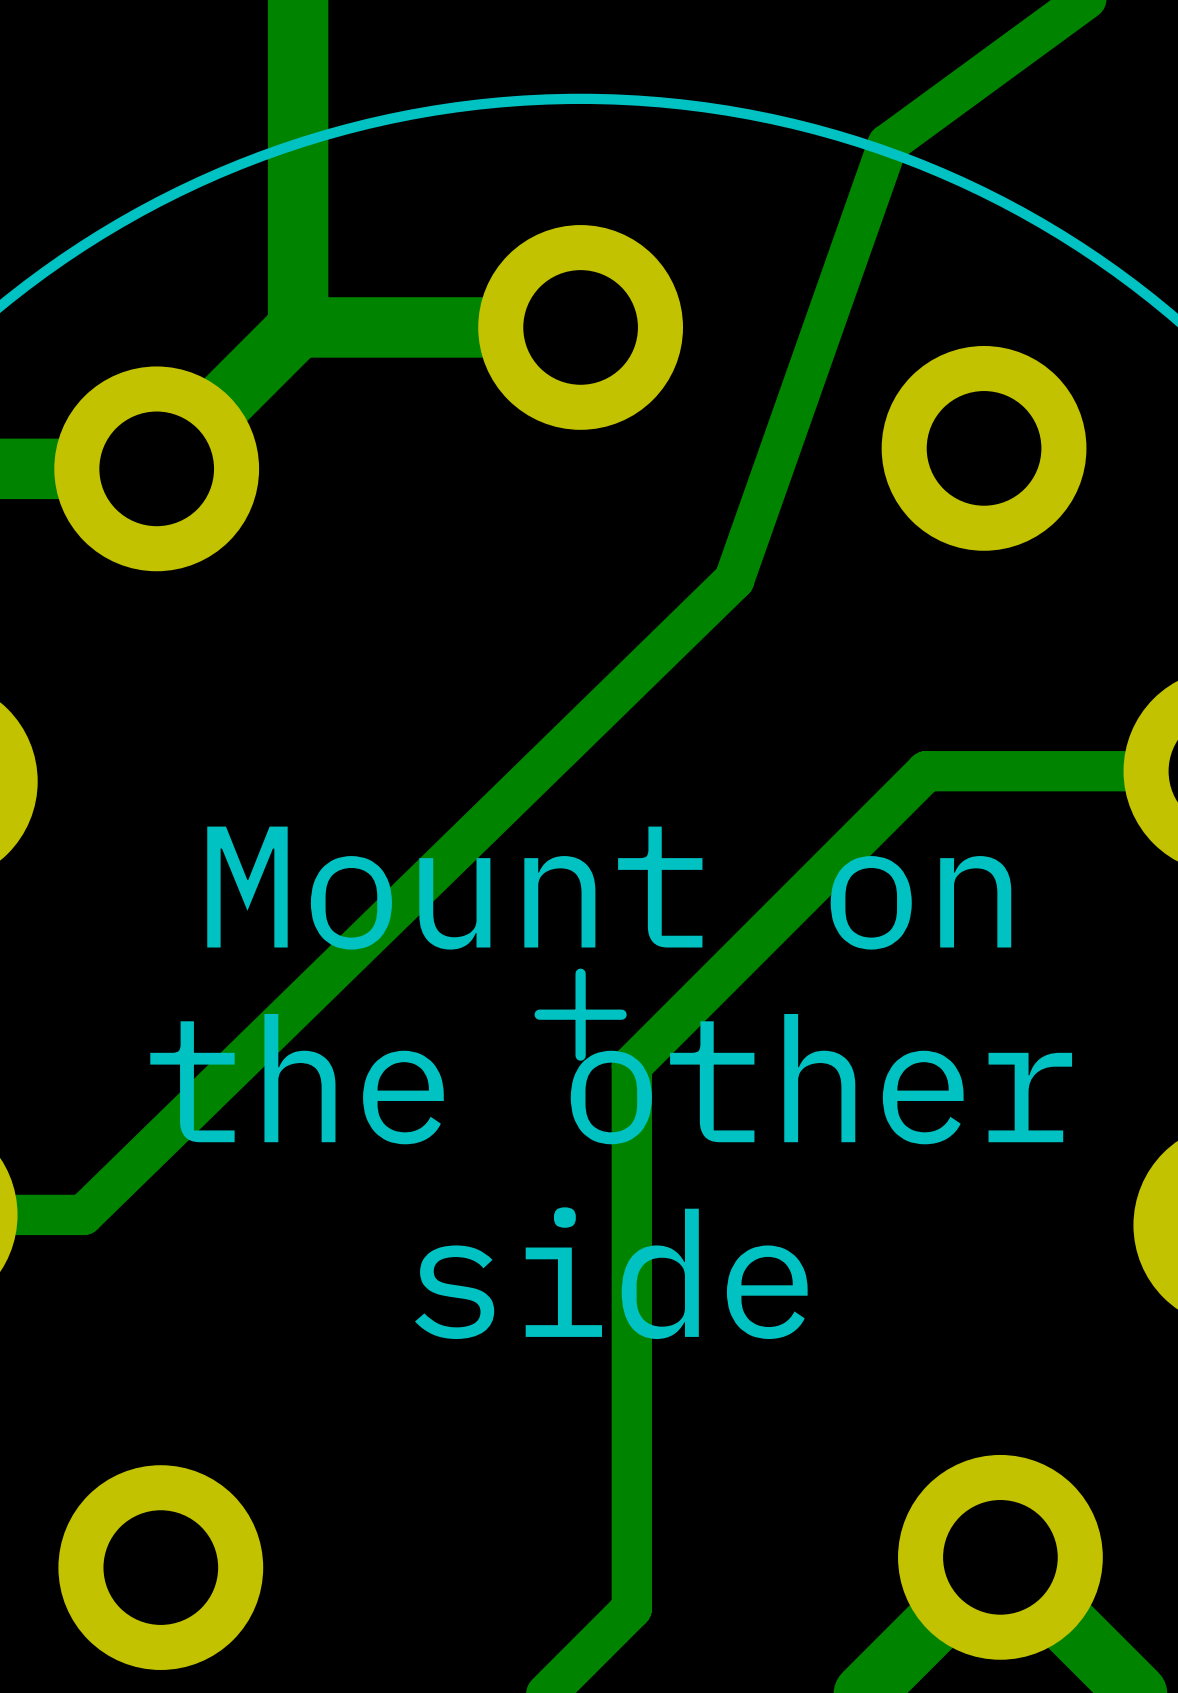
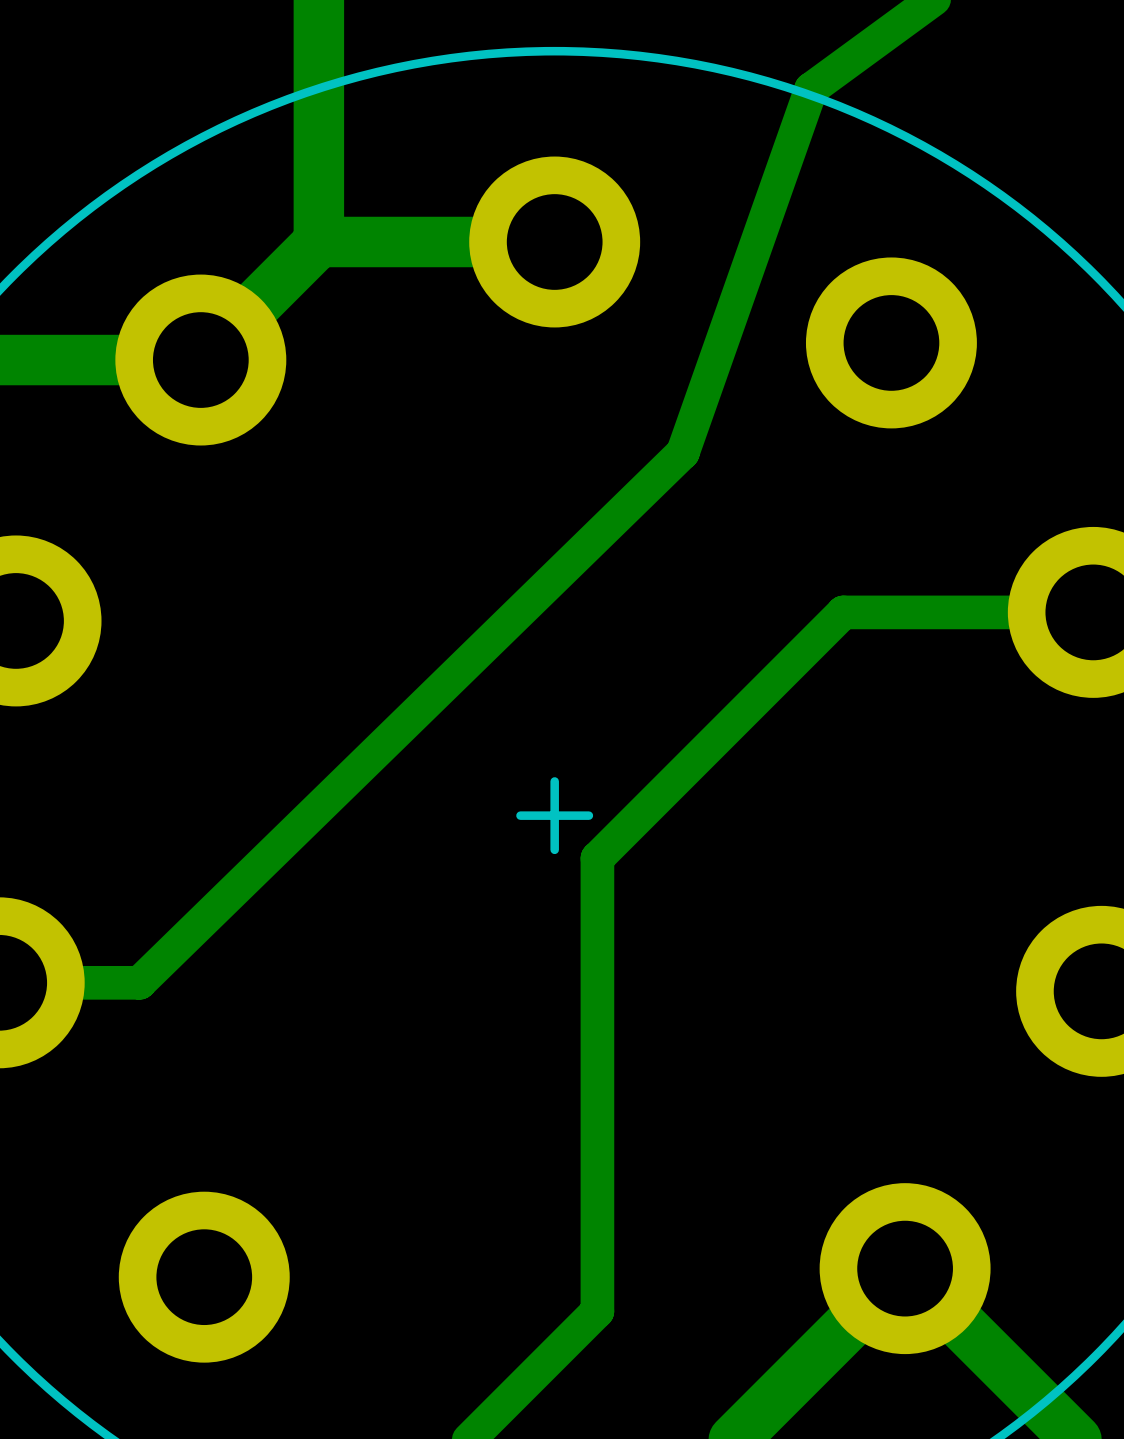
text: Mount on (609, 888) -> none
text: the other (611, 1079) -> none
text: side (611, 1273) -> none

